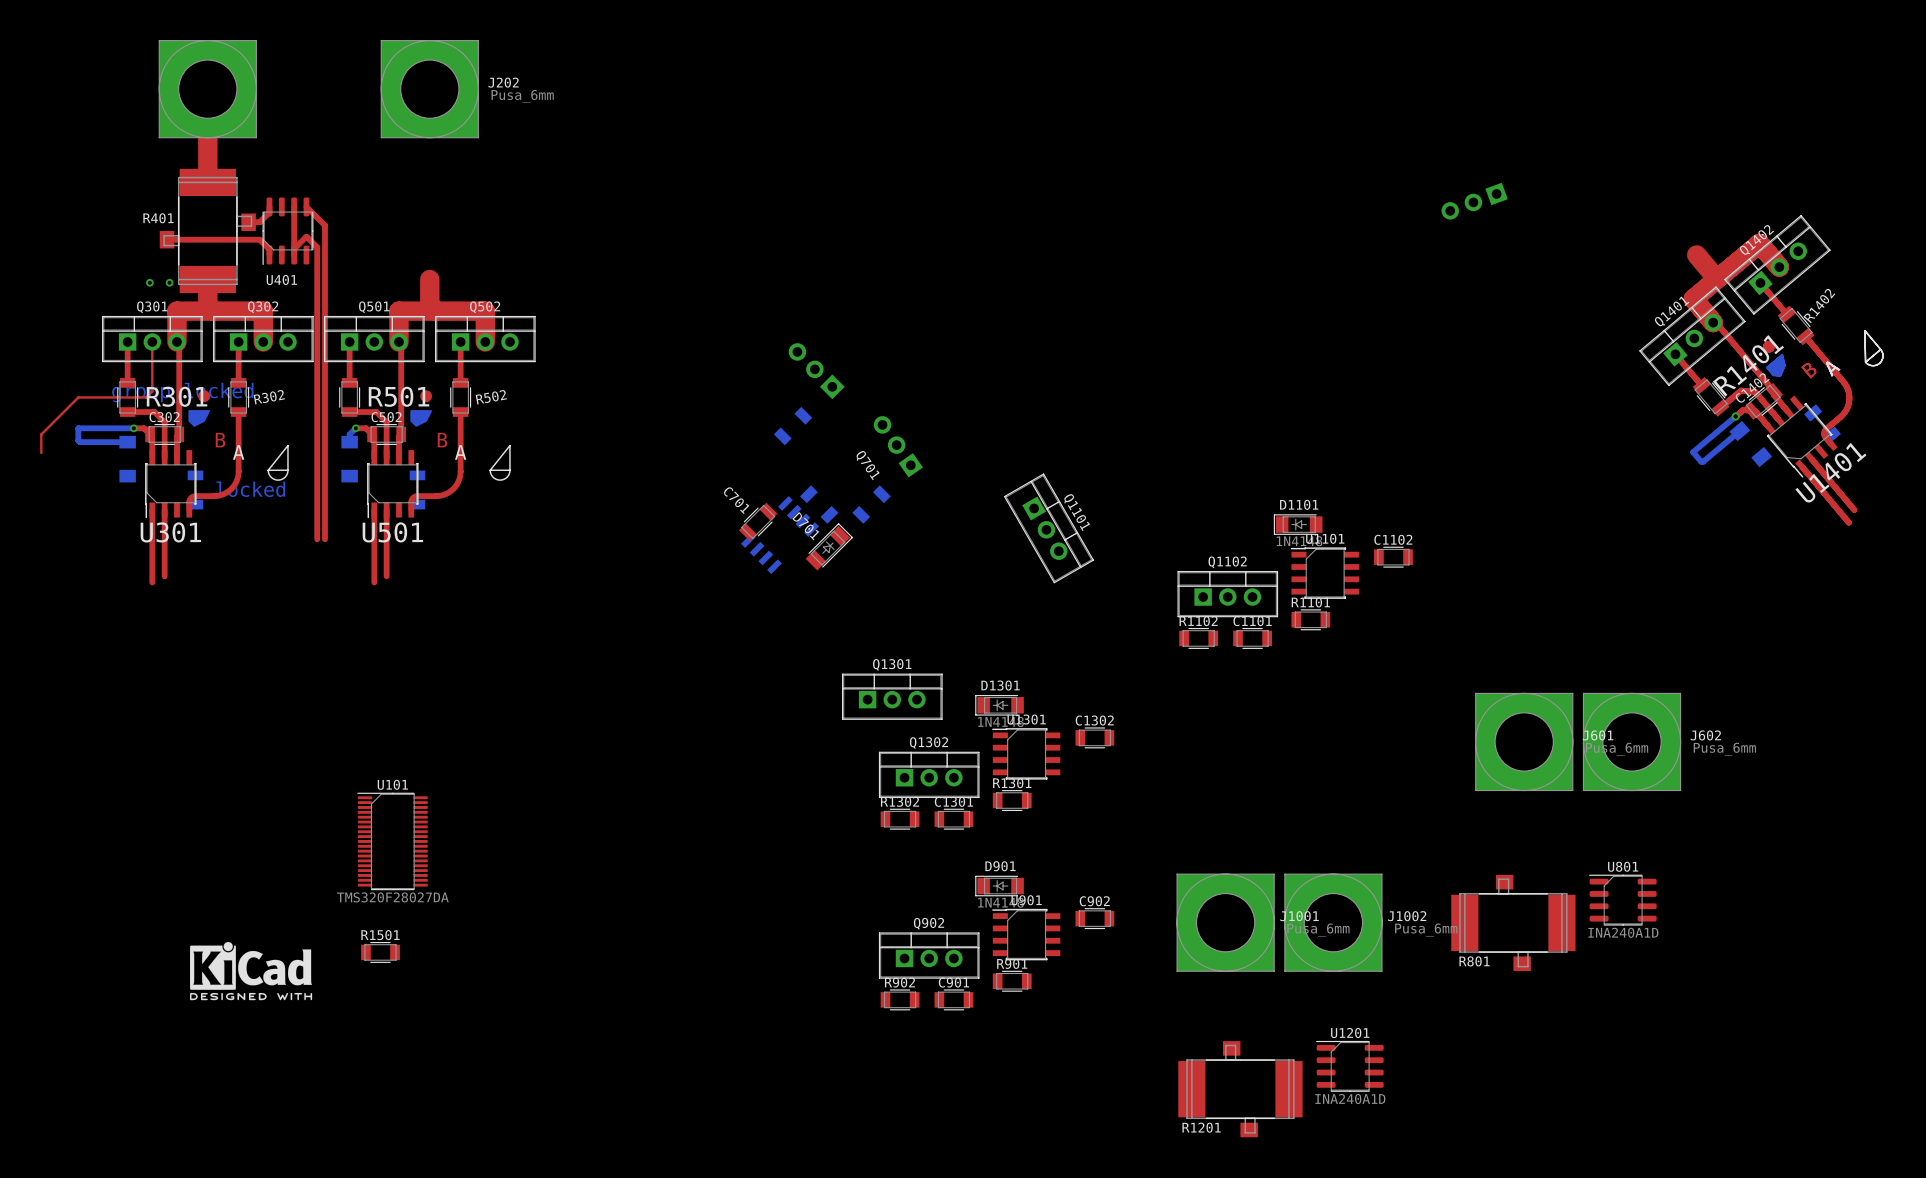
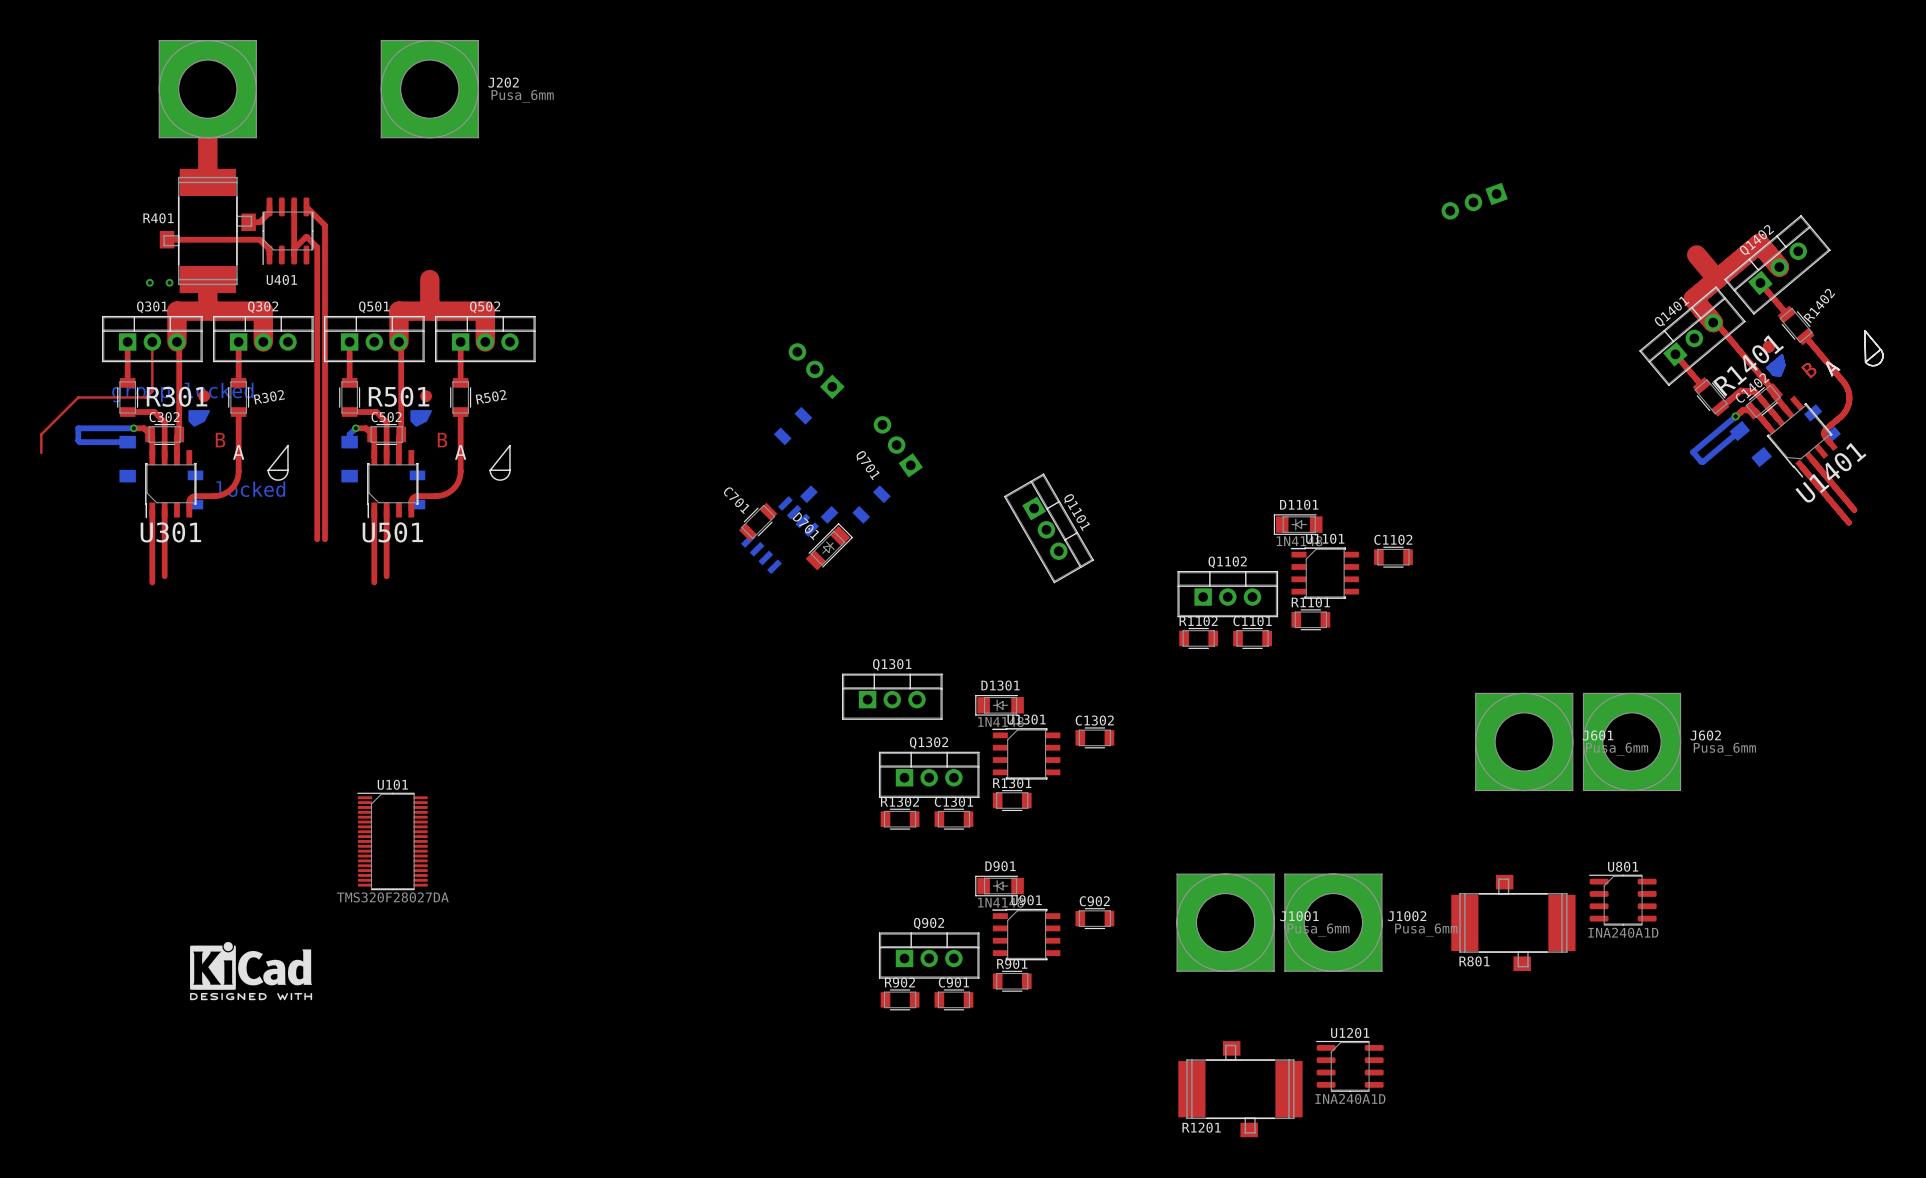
R1501: (380, 952) -> none

